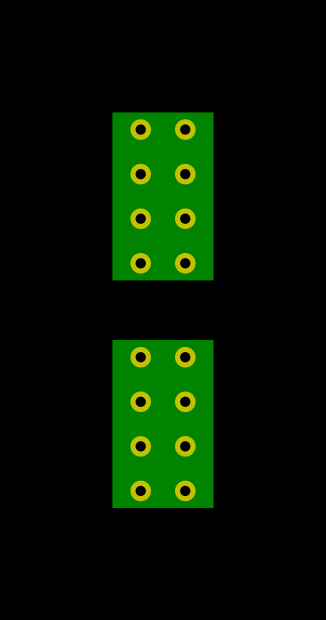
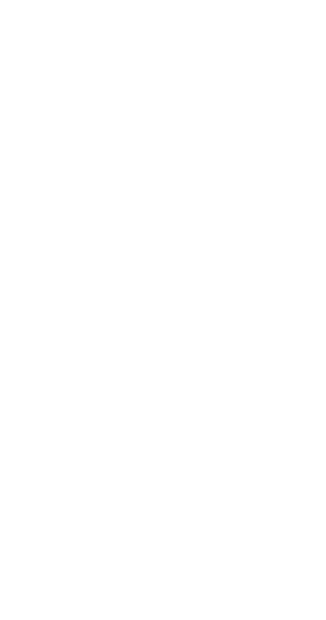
part: (162, 196) -> none
part: (162, 424) -> none

